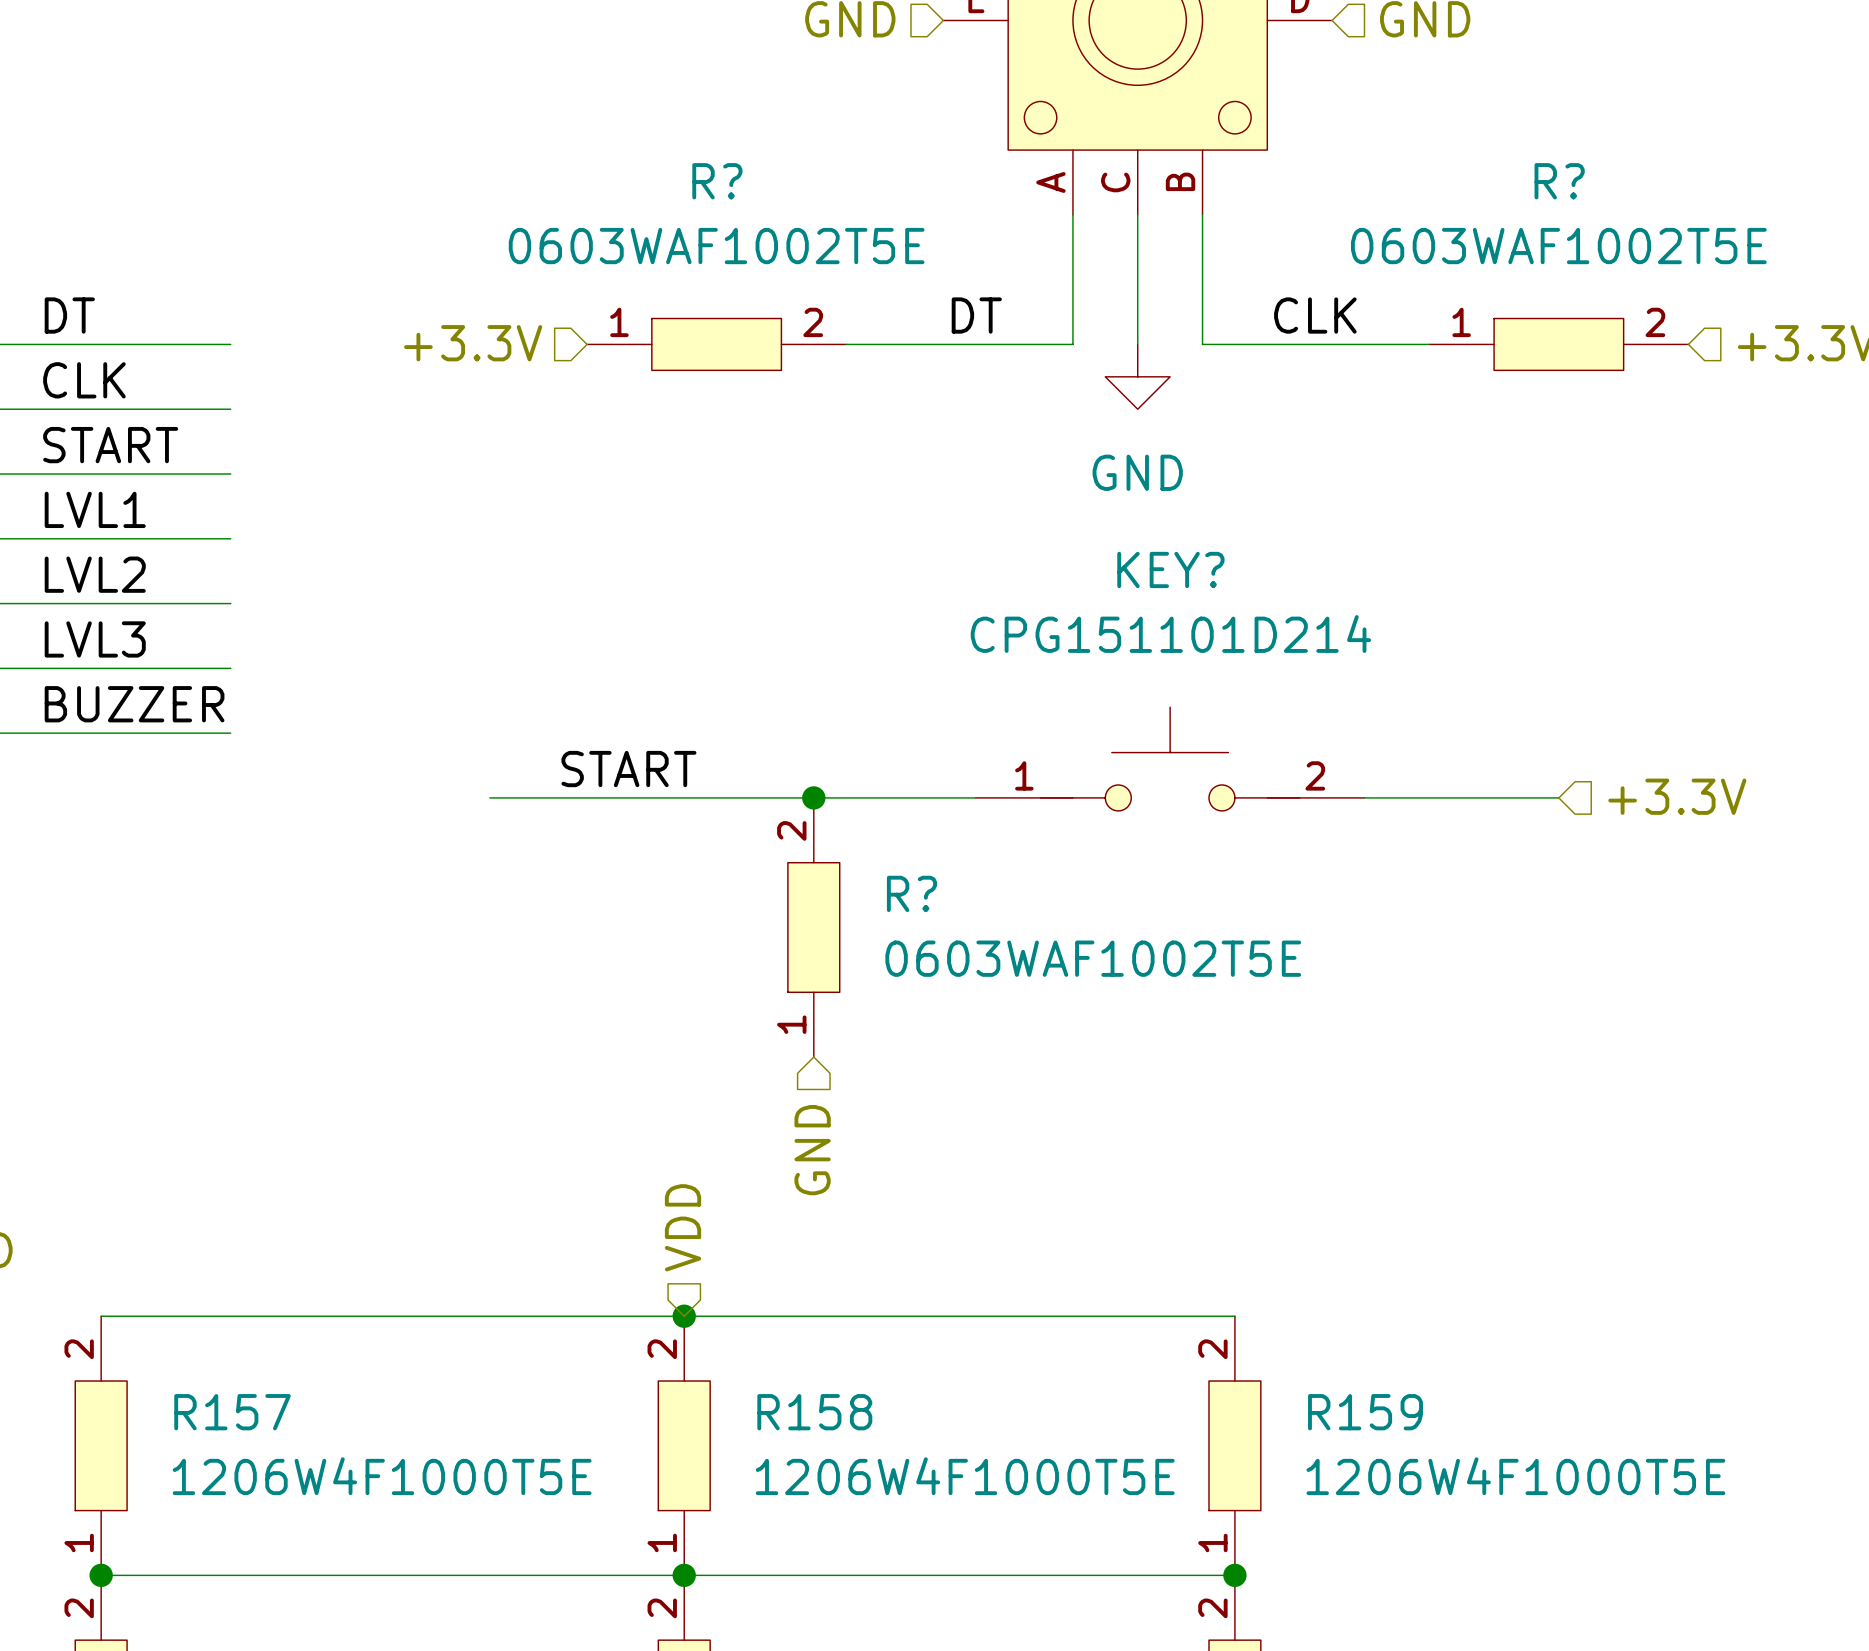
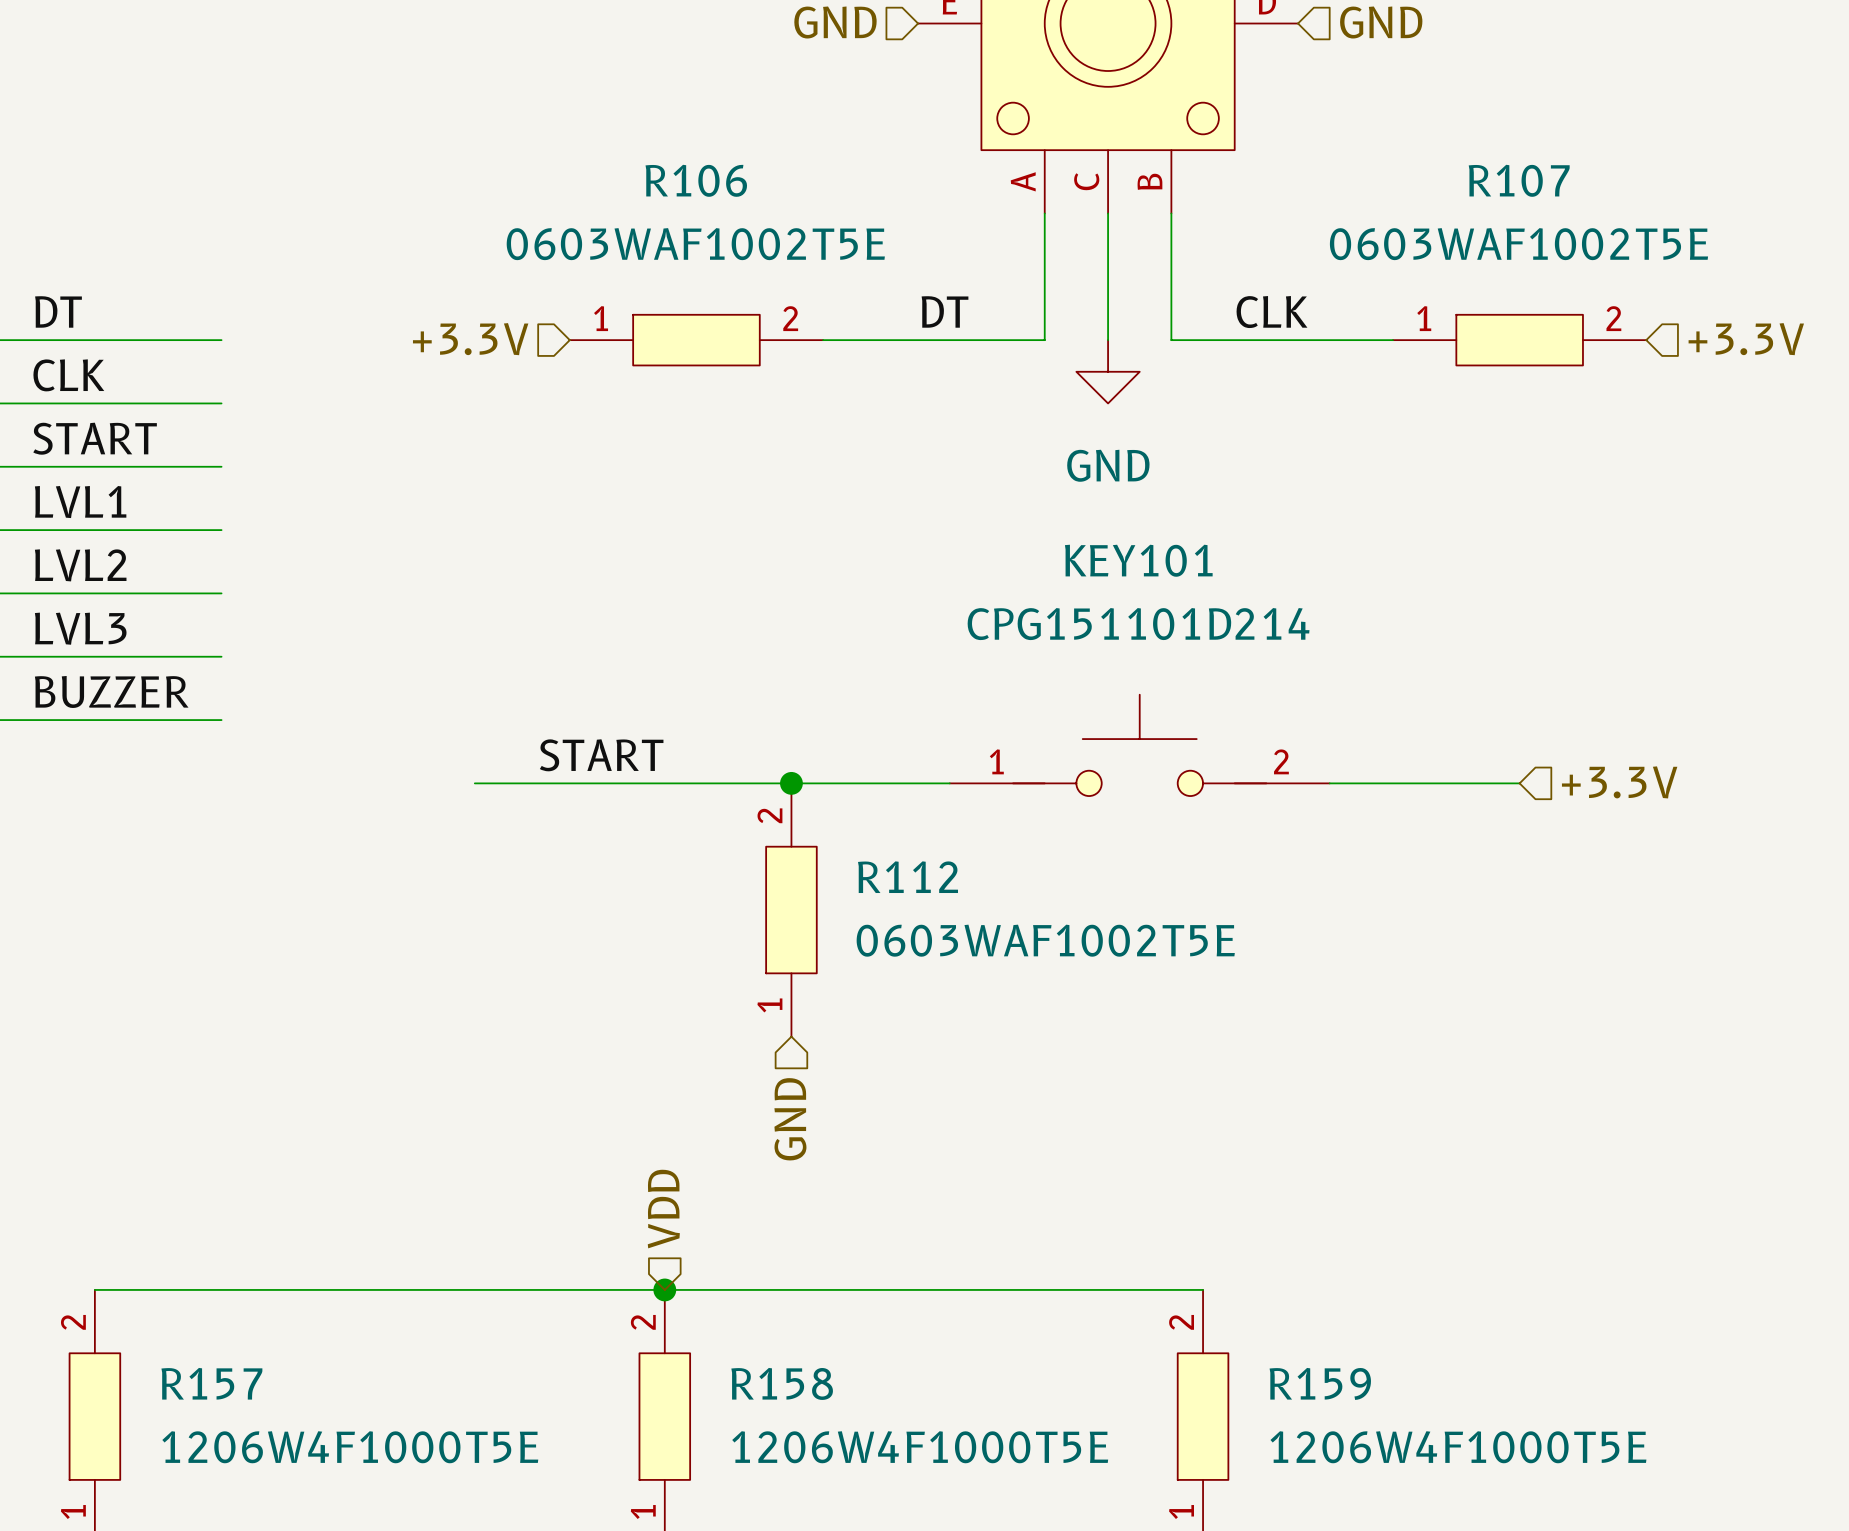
R? name: R? (717, 181) -> R106 (696, 180)
R? name: R? (1559, 181) -> R107 (1519, 180)
KEY? name: KEY? (1170, 569) -> KEY101 (1138, 560)
R? name: R? (912, 893) -> R112 (908, 877)

